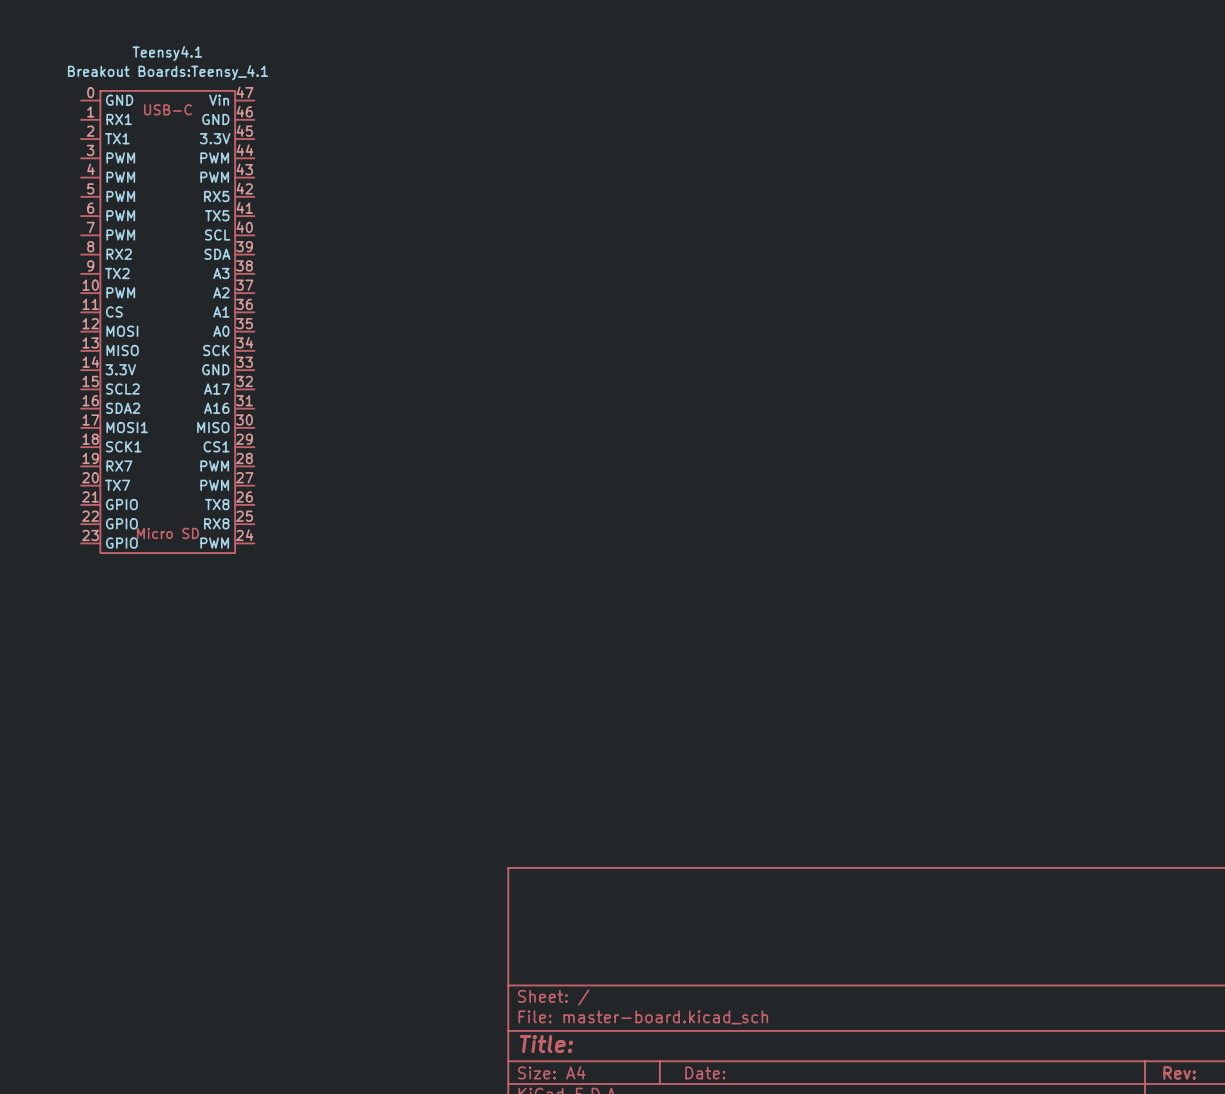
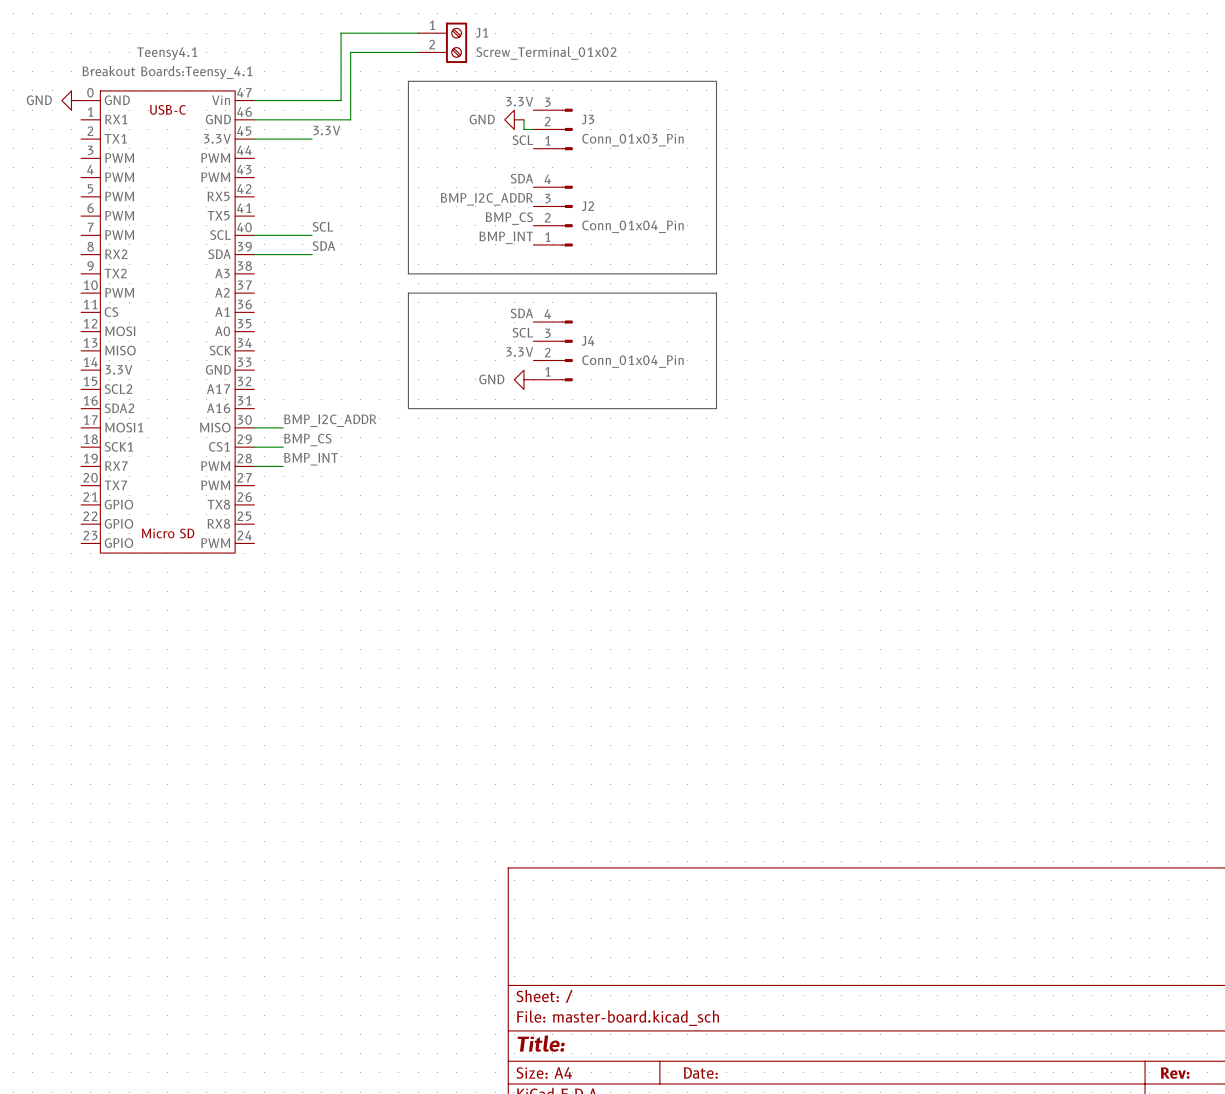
wire: none -> (418, 33) (341, 33) (341, 100) (254, 100)
J1: none -> Screw_Terminal_01x02 (442, 42)
wire: none -> (418, 52) (350, 52) (350, 119) (254, 119)
line: none -> (408, 81) (716, 81) (716, 273) (408, 273) (408, 81)
power symbol: none -> GND (71, 100)
label: none -> 3.3V (519, 101)
power symbol: none -> GND (514, 119)
wire: none -> (523, 119) (523, 129) (533, 129)
J3: none -> Conn_01x03_Pin (553, 129)
label: none -> 3.3V (326, 130)
wire: none -> (254, 139) (312, 139)
label: none -> SCL (522, 140)
label: none -> SDA (521, 178)
label: none -> BMP_I2C_ADDR (487, 199)
J2: none -> Conn_01x04_Pin (553, 216)
label: none -> BMP_CS (509, 218)
label: none -> SCL (322, 226)
wire: none -> (254, 235) (312, 235)
label: none -> BMP_INT (506, 237)
label: none -> SDA (323, 246)
wire: none -> (254, 254) (312, 254)
line: none -> (408, 293) (408, 408) (716, 408) (716, 293) (408, 293)
label: none -> SDA (521, 313)
label: none -> SCL (522, 332)
J4: none -> Conn_01x04_Pin (553, 350)
label: none -> 3.3V (519, 351)
power symbol: none -> GND (523, 379)
label: none -> BMP_I2C_ADDR (330, 420)
wire: none -> (254, 427) (283, 427)
label: none -> BMP_CS (307, 440)
wire: none -> (254, 447) (283, 447)
label: none -> BMP_INT (311, 459)
wire: none -> (254, 466) (283, 466)

